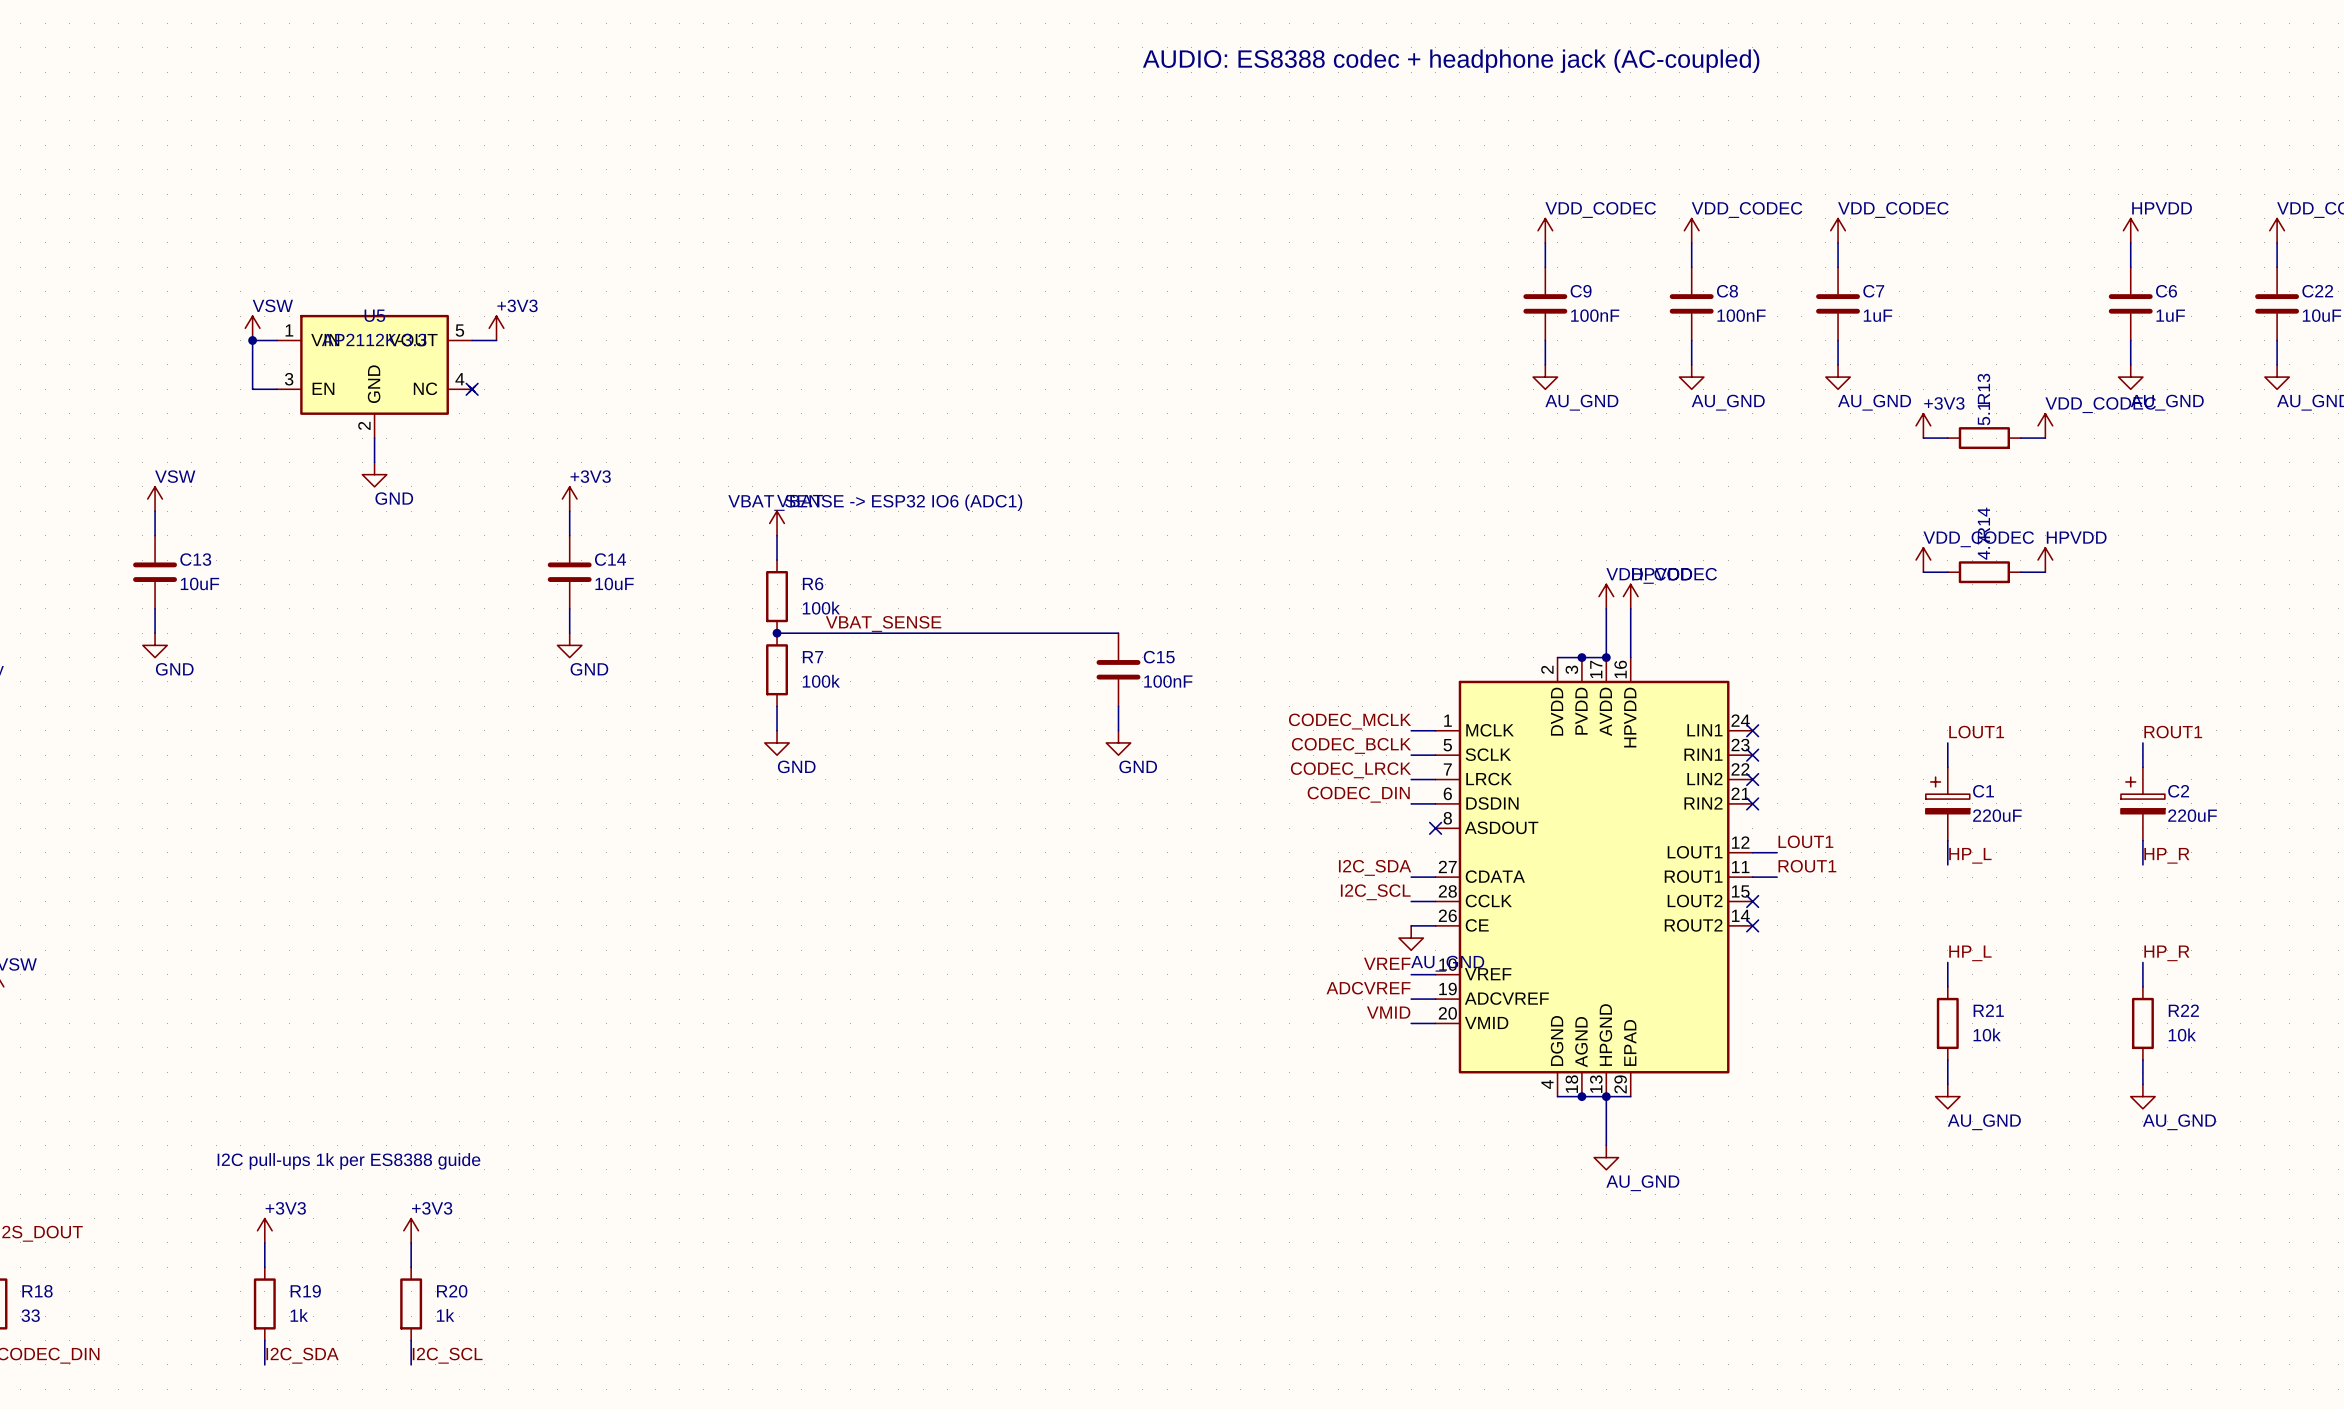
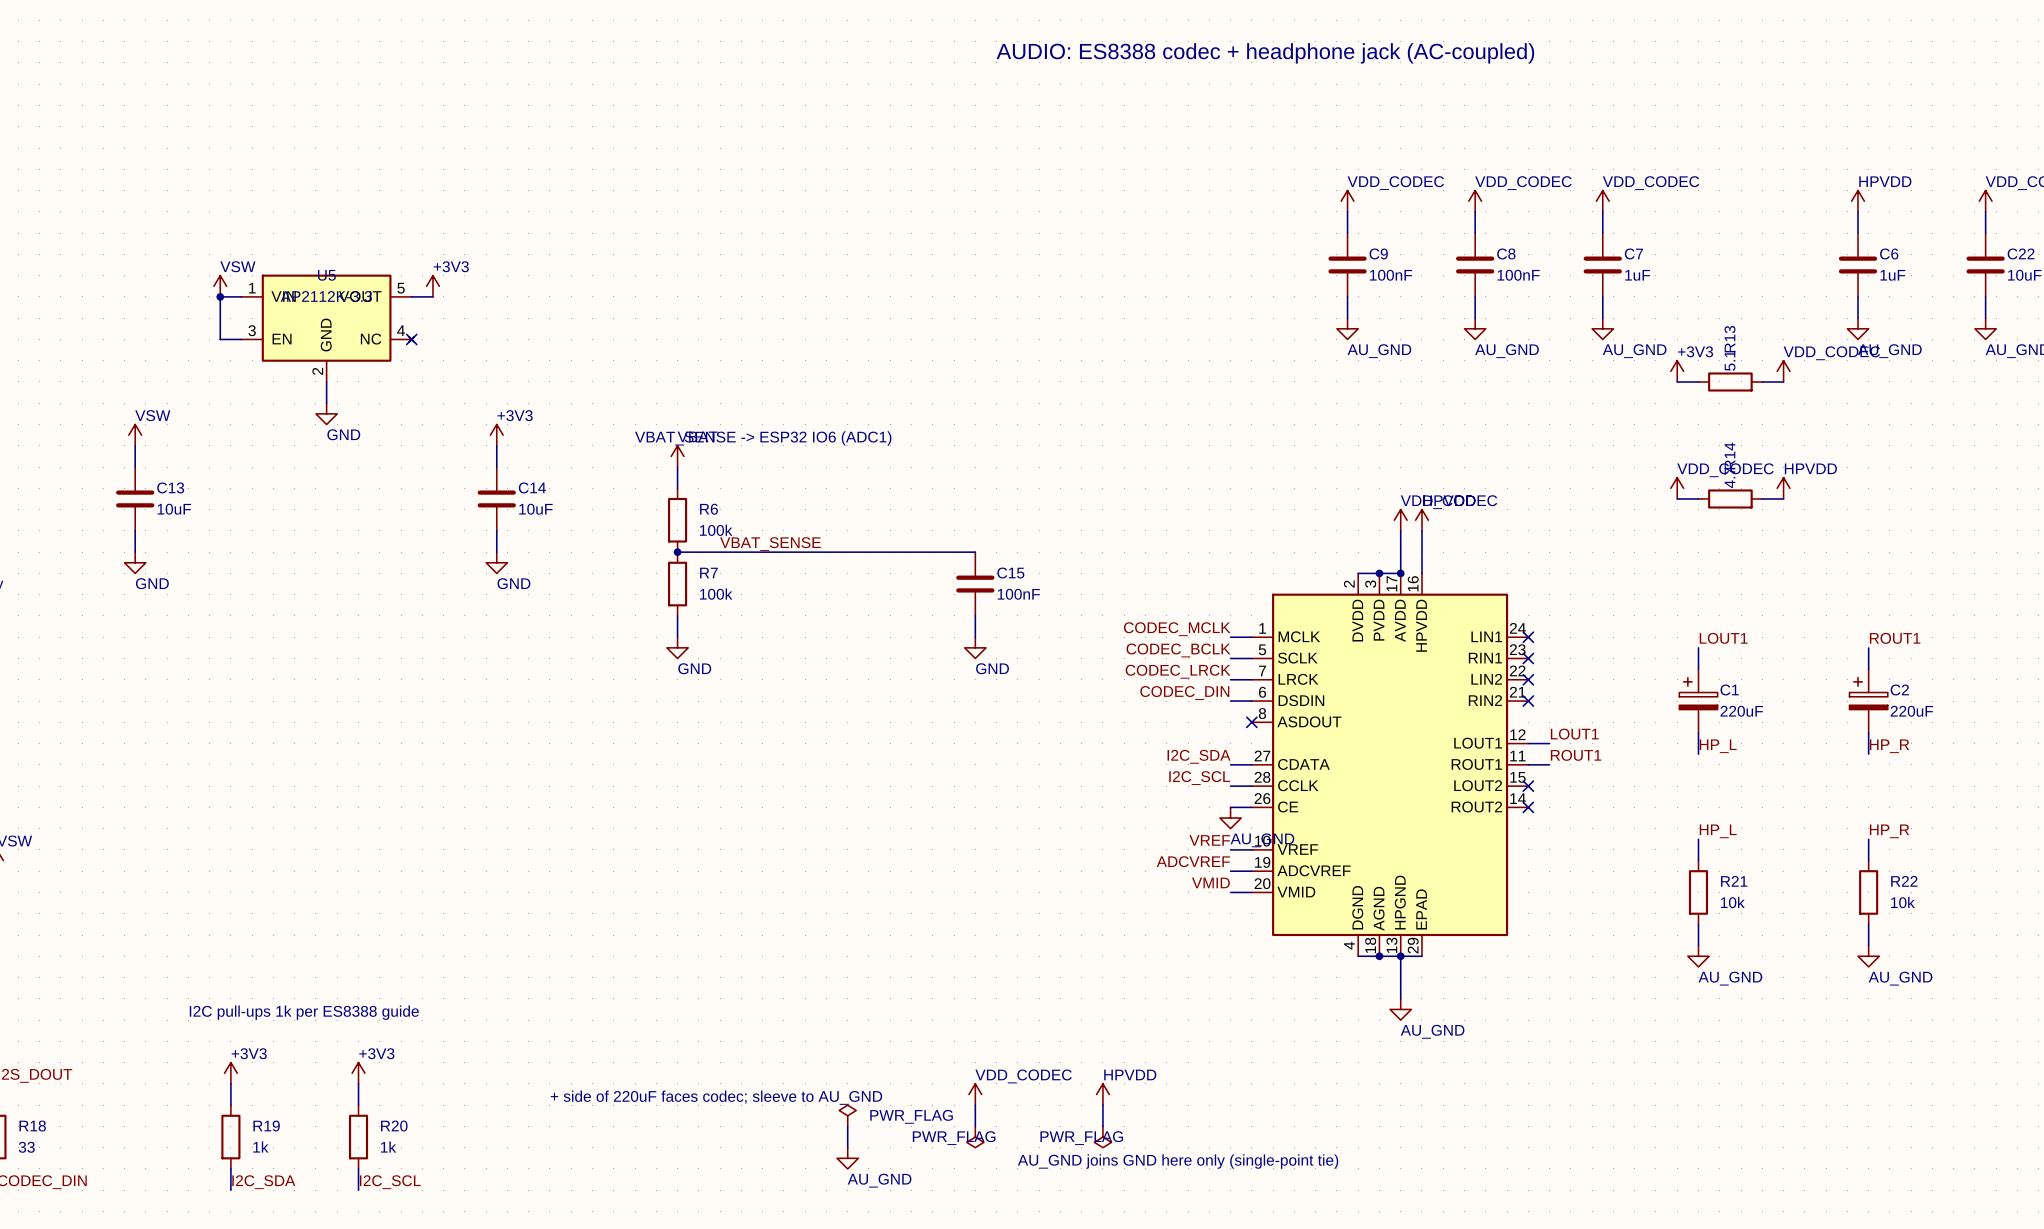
power symbol: none -> VDD_CODEC (975, 1094)
power symbol: none -> HPVDD (1102, 1094)
text: none -> + side of 220uF faces codec; sleeve to AU_GND (716, 1097)
wire: none -> (975, 1105) (975, 1126)
wire: none -> (1102, 1105) (1102, 1126)
power symbol: none -> PWR_FLAG (847, 1115)
wire: none -> (847, 1126) (847, 1147)
power symbol: none -> PWR_FLAG (975, 1137)
power symbol: none -> PWR_FLAG (1102, 1137)
power symbol: none -> AU_GND (847, 1158)
text: none -> AU_GND joins GND here only (single-point tie) (1178, 1161)

